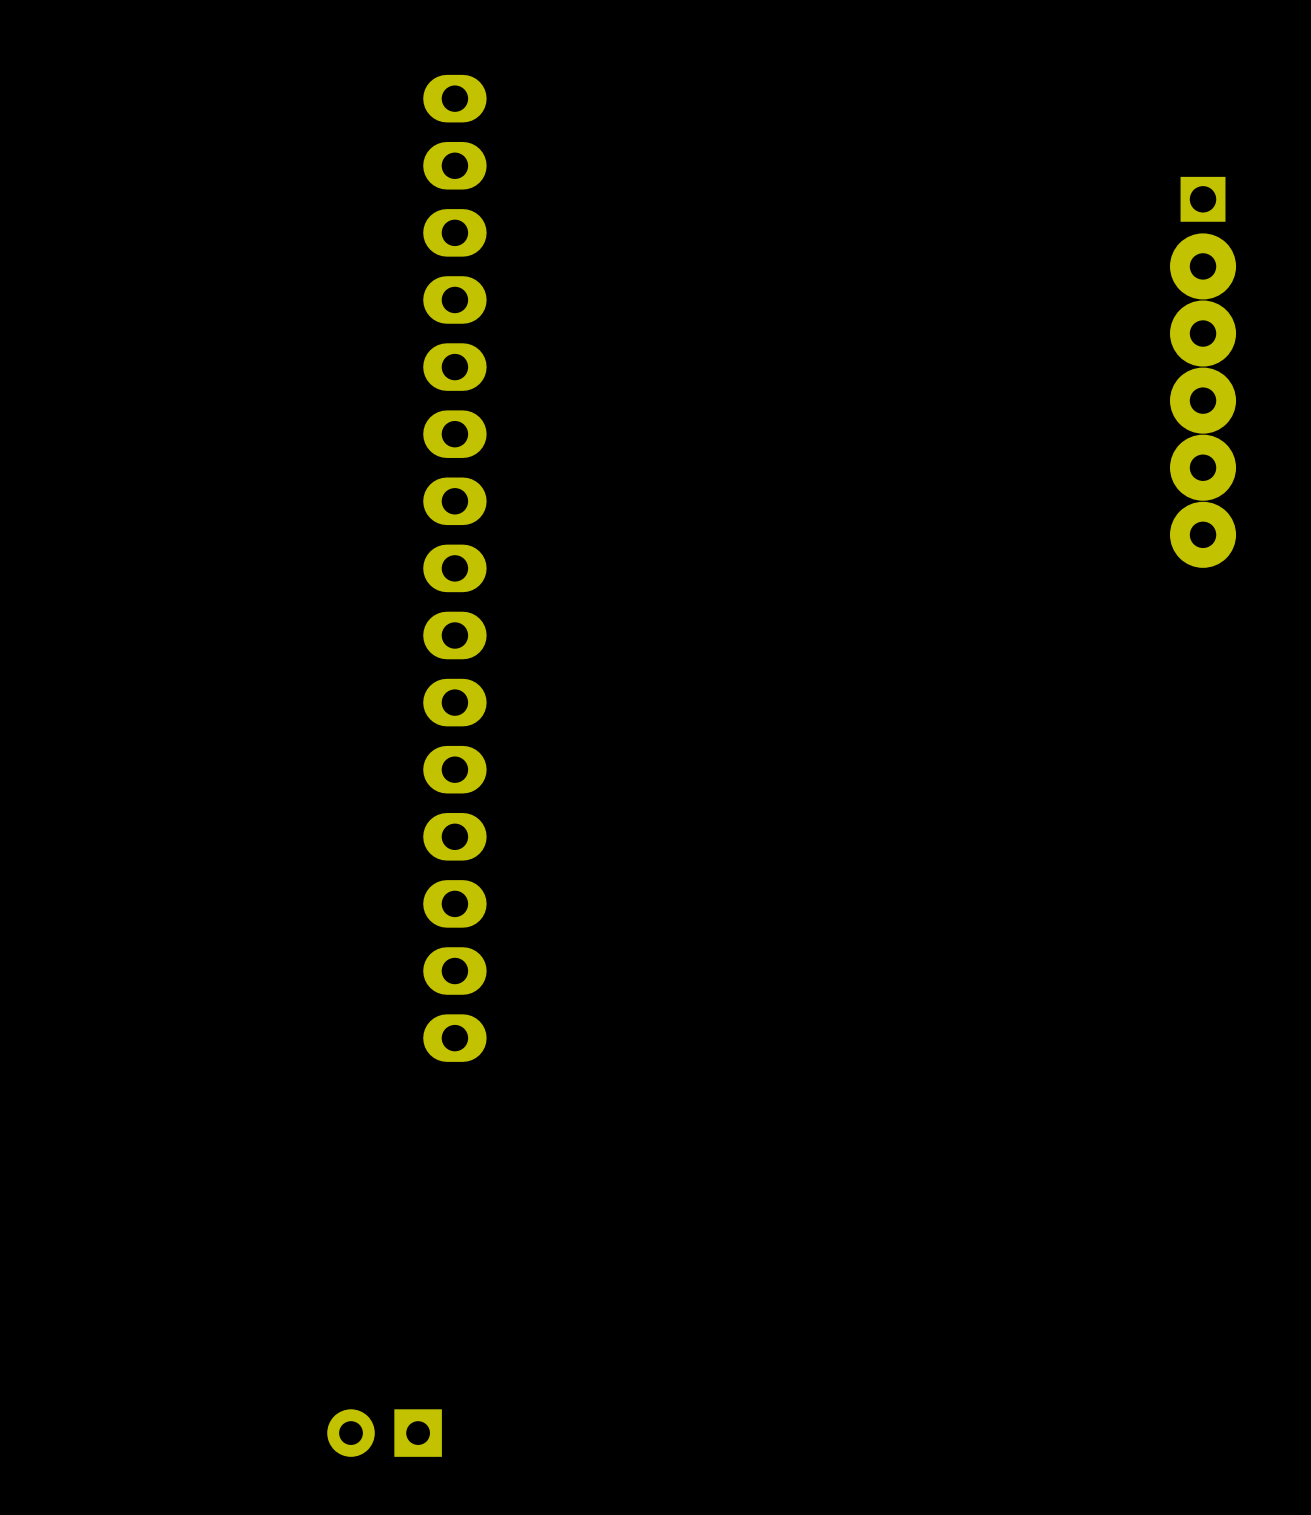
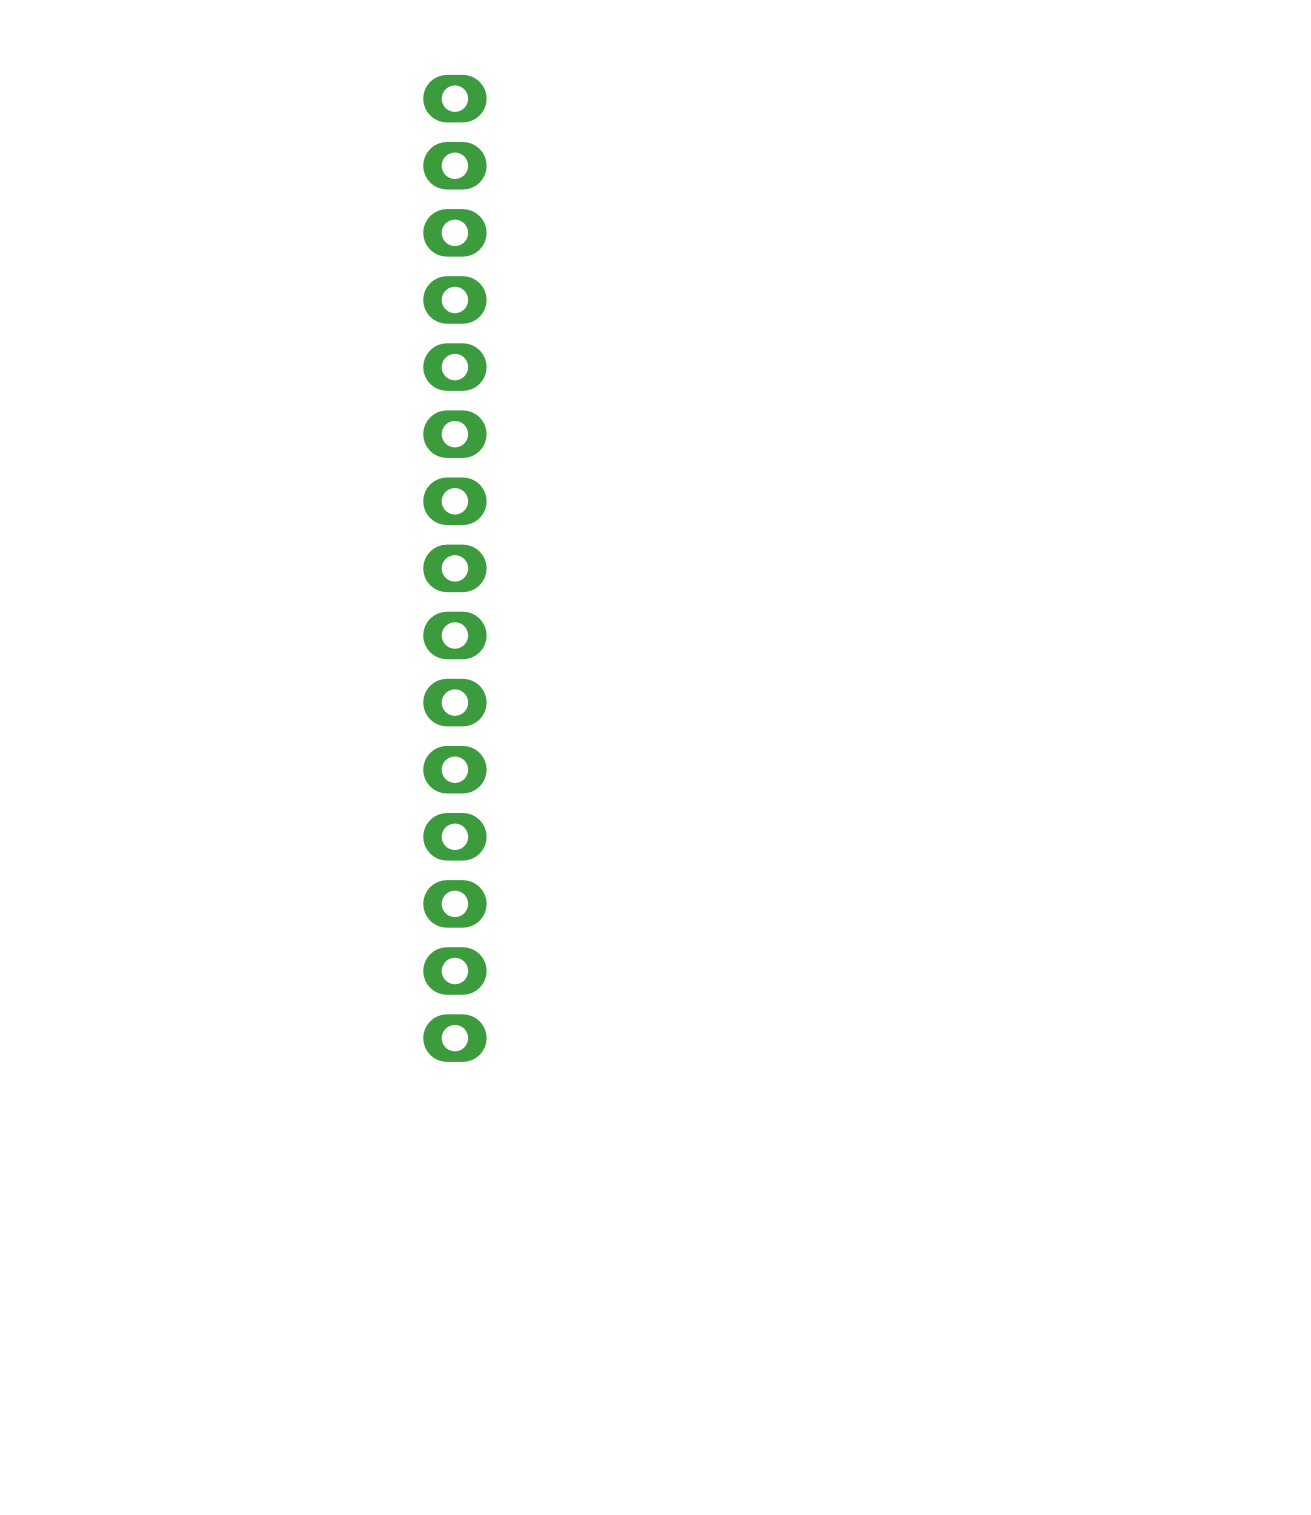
part: (1203, 372) -> none
part: (384, 1433) -> none

